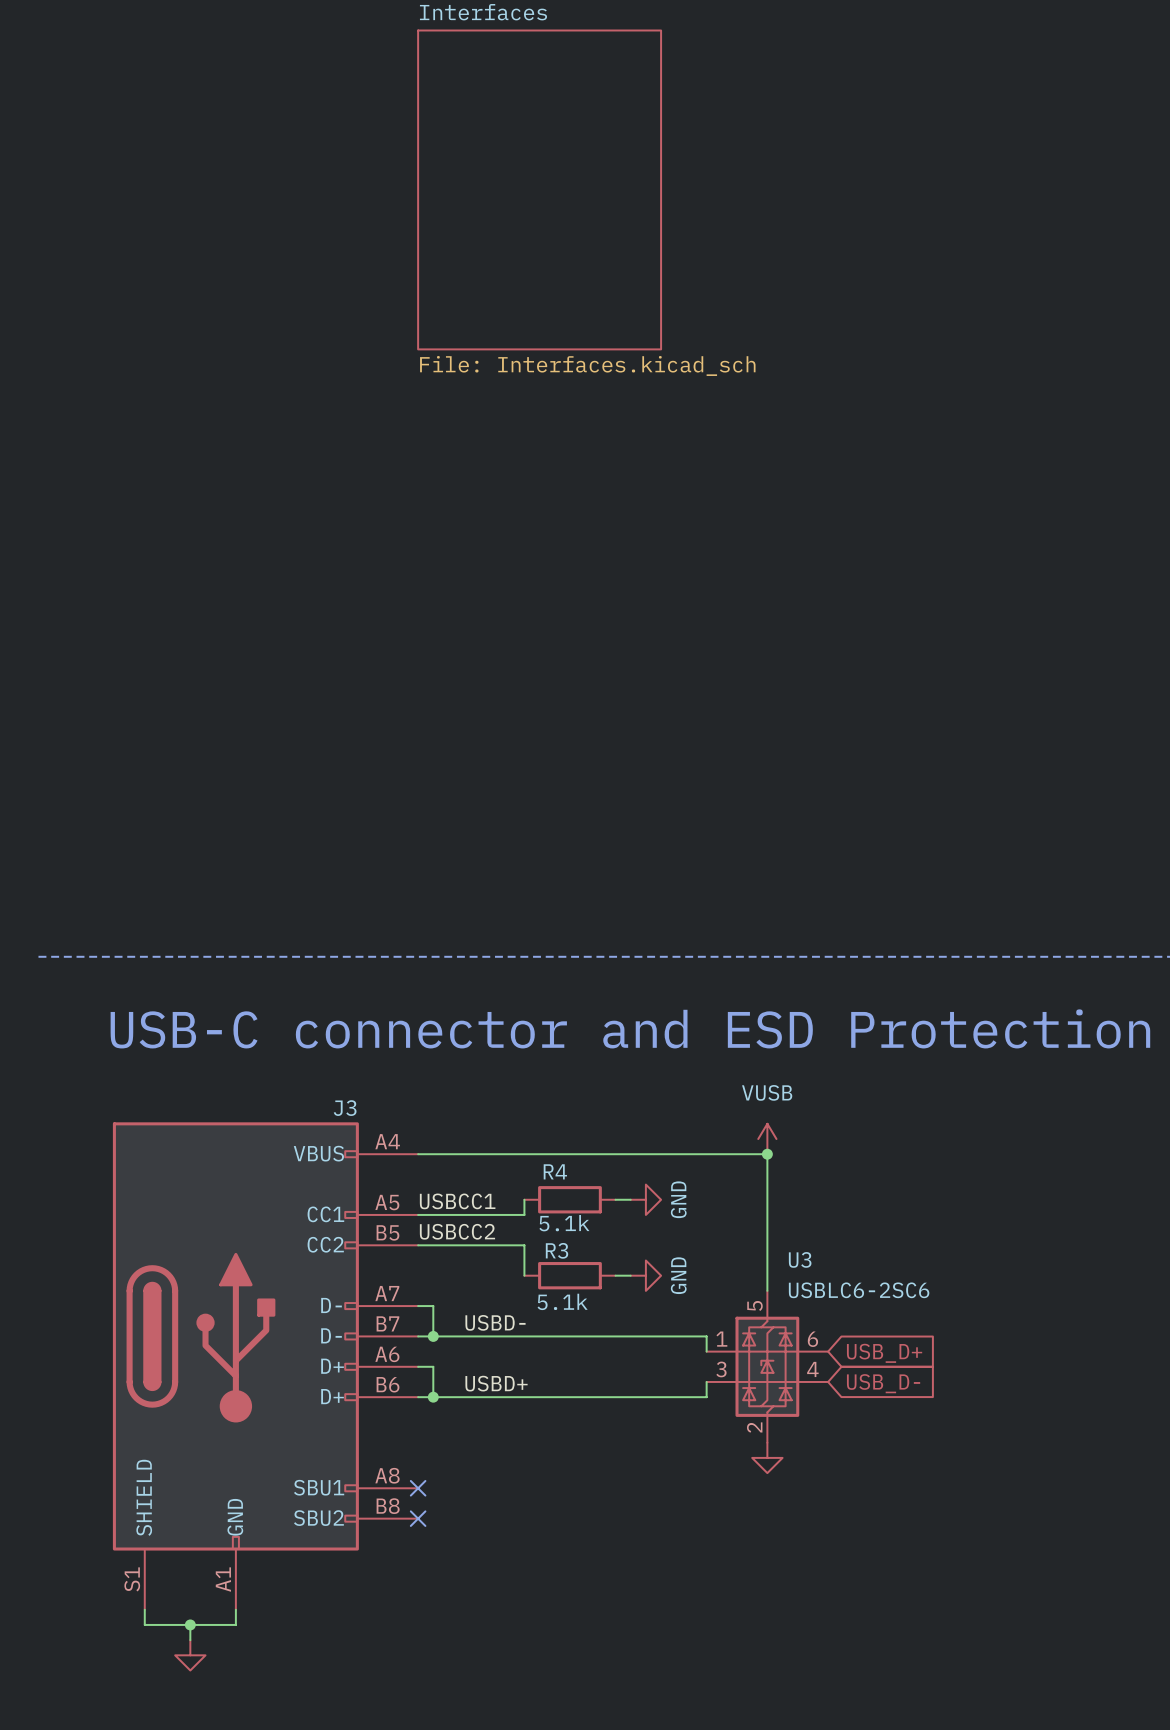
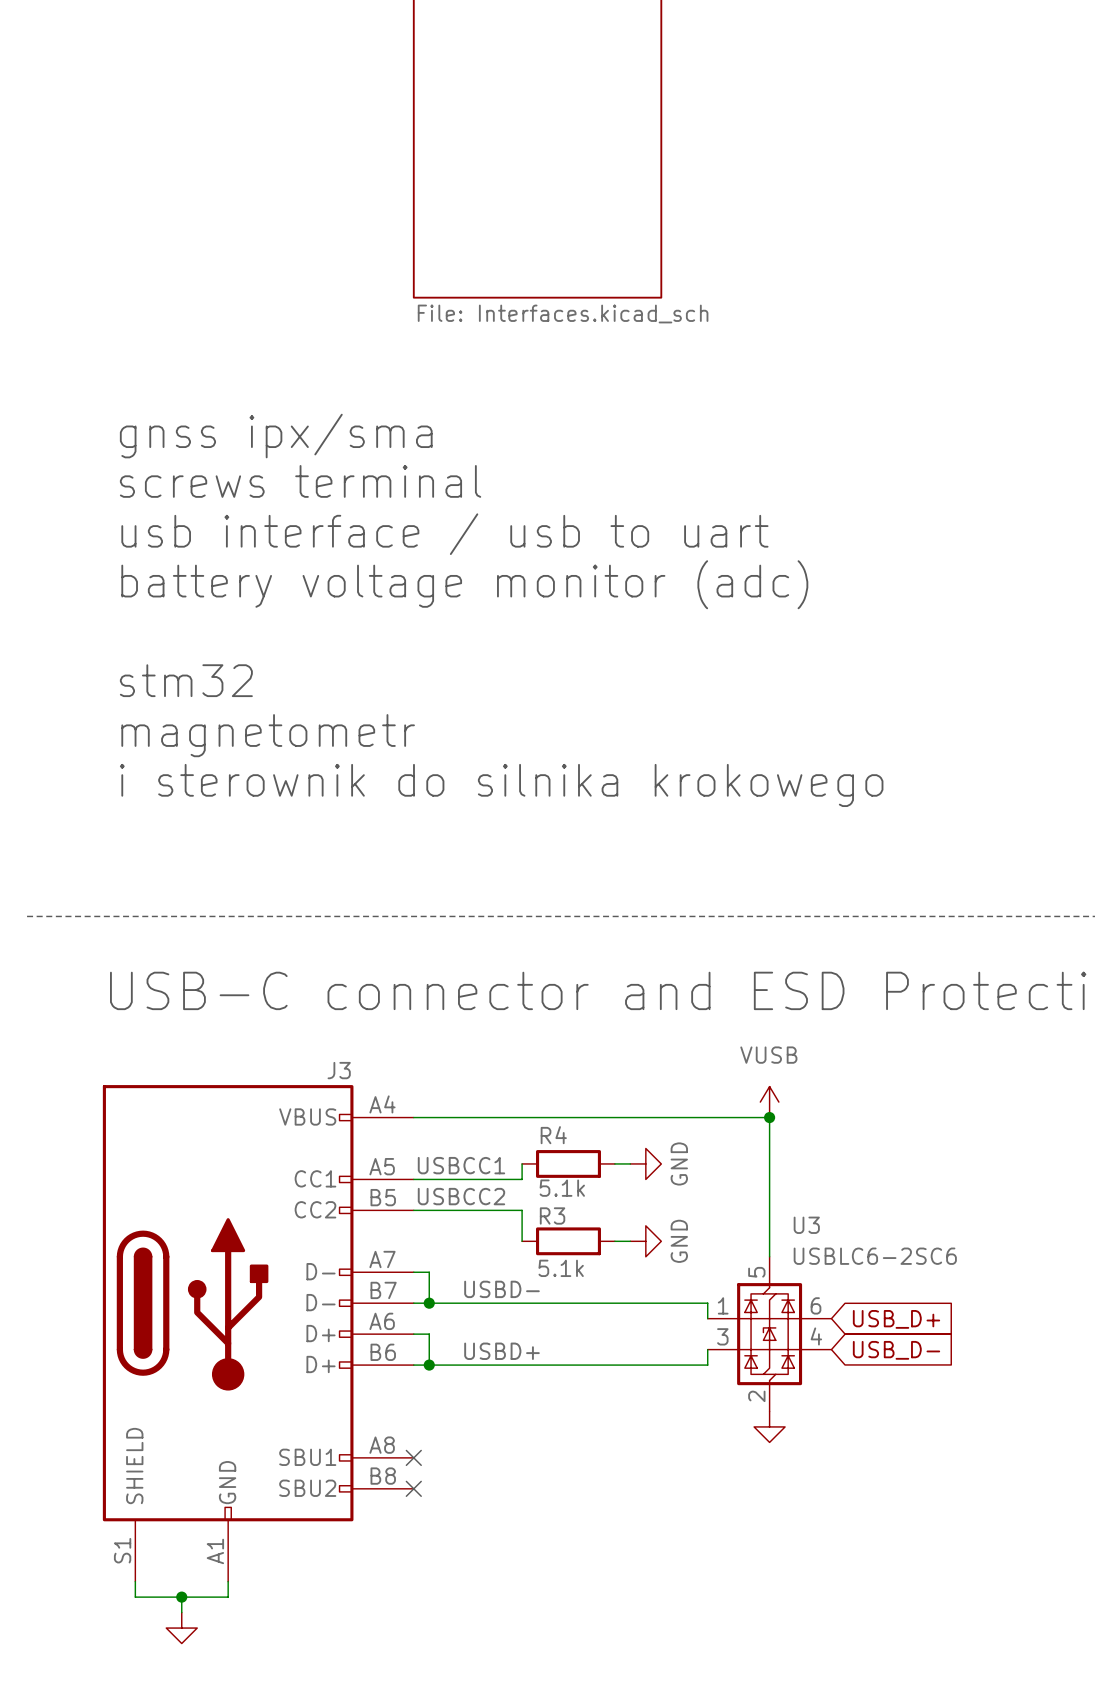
text: none -> gnss ipx/sma (276, 436)
text: none -> screws terminal (300, 481)
text: none -> usb interface / usb to uart (444, 534)
text: none -> battery voltage monitor (adc) (464, 584)
text: none -> stm32 (186, 680)
text: none -> magnetometr (268, 735)
text: none -> i sterownik do silnika krokowego (501, 785)

